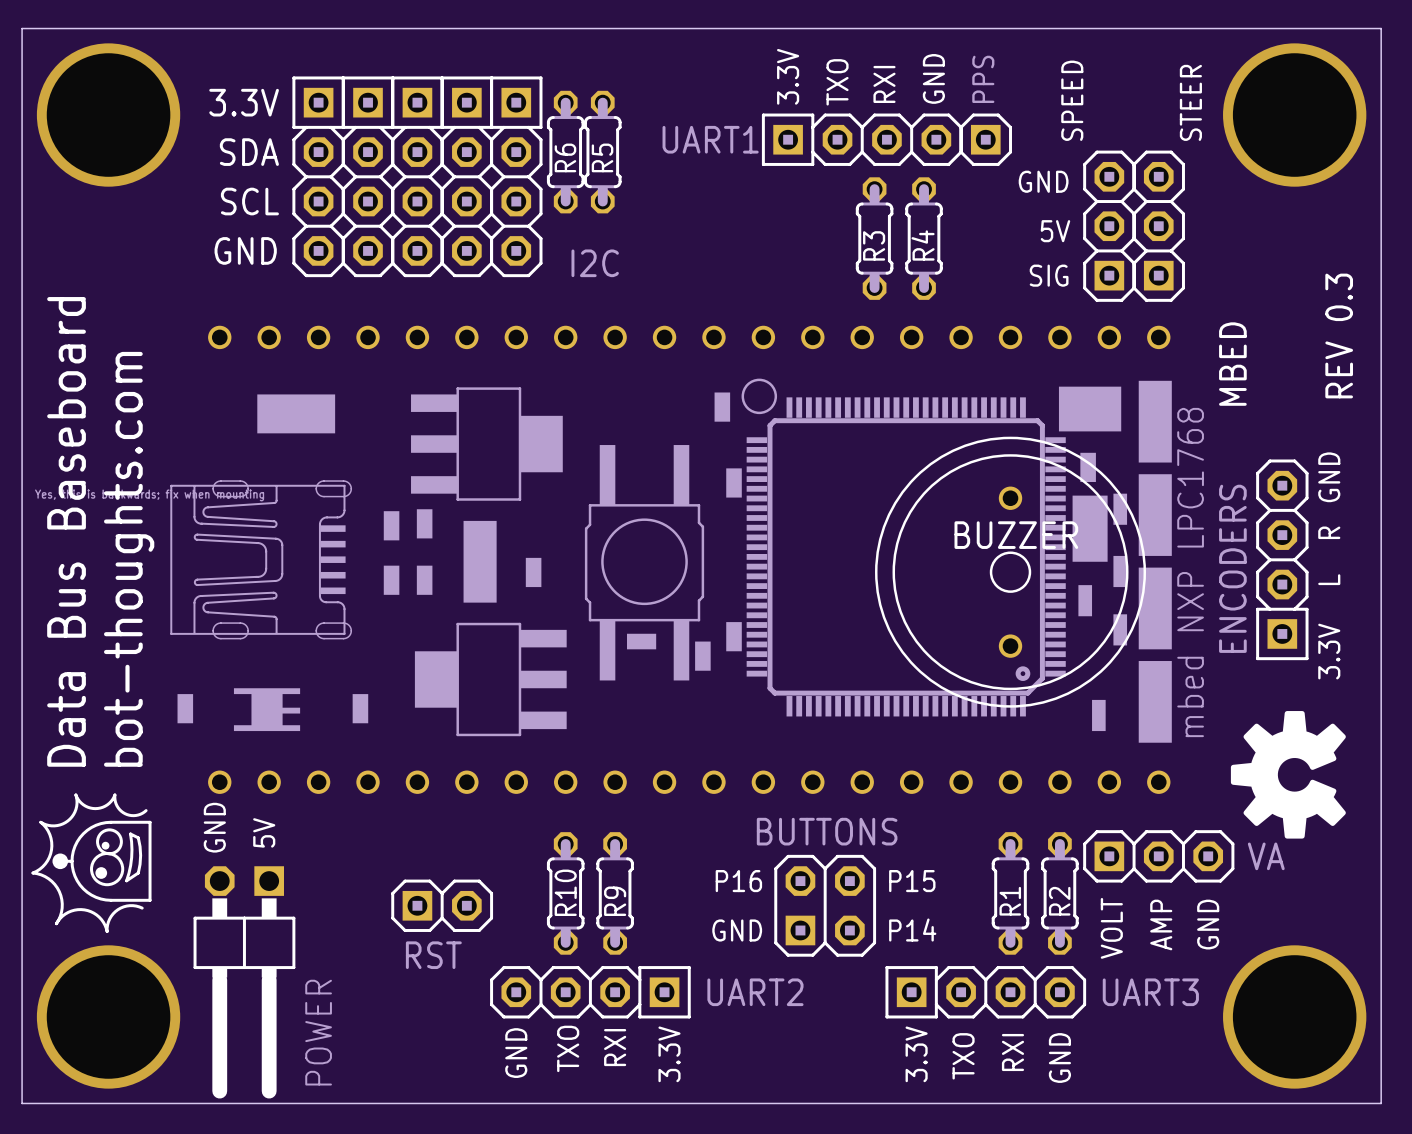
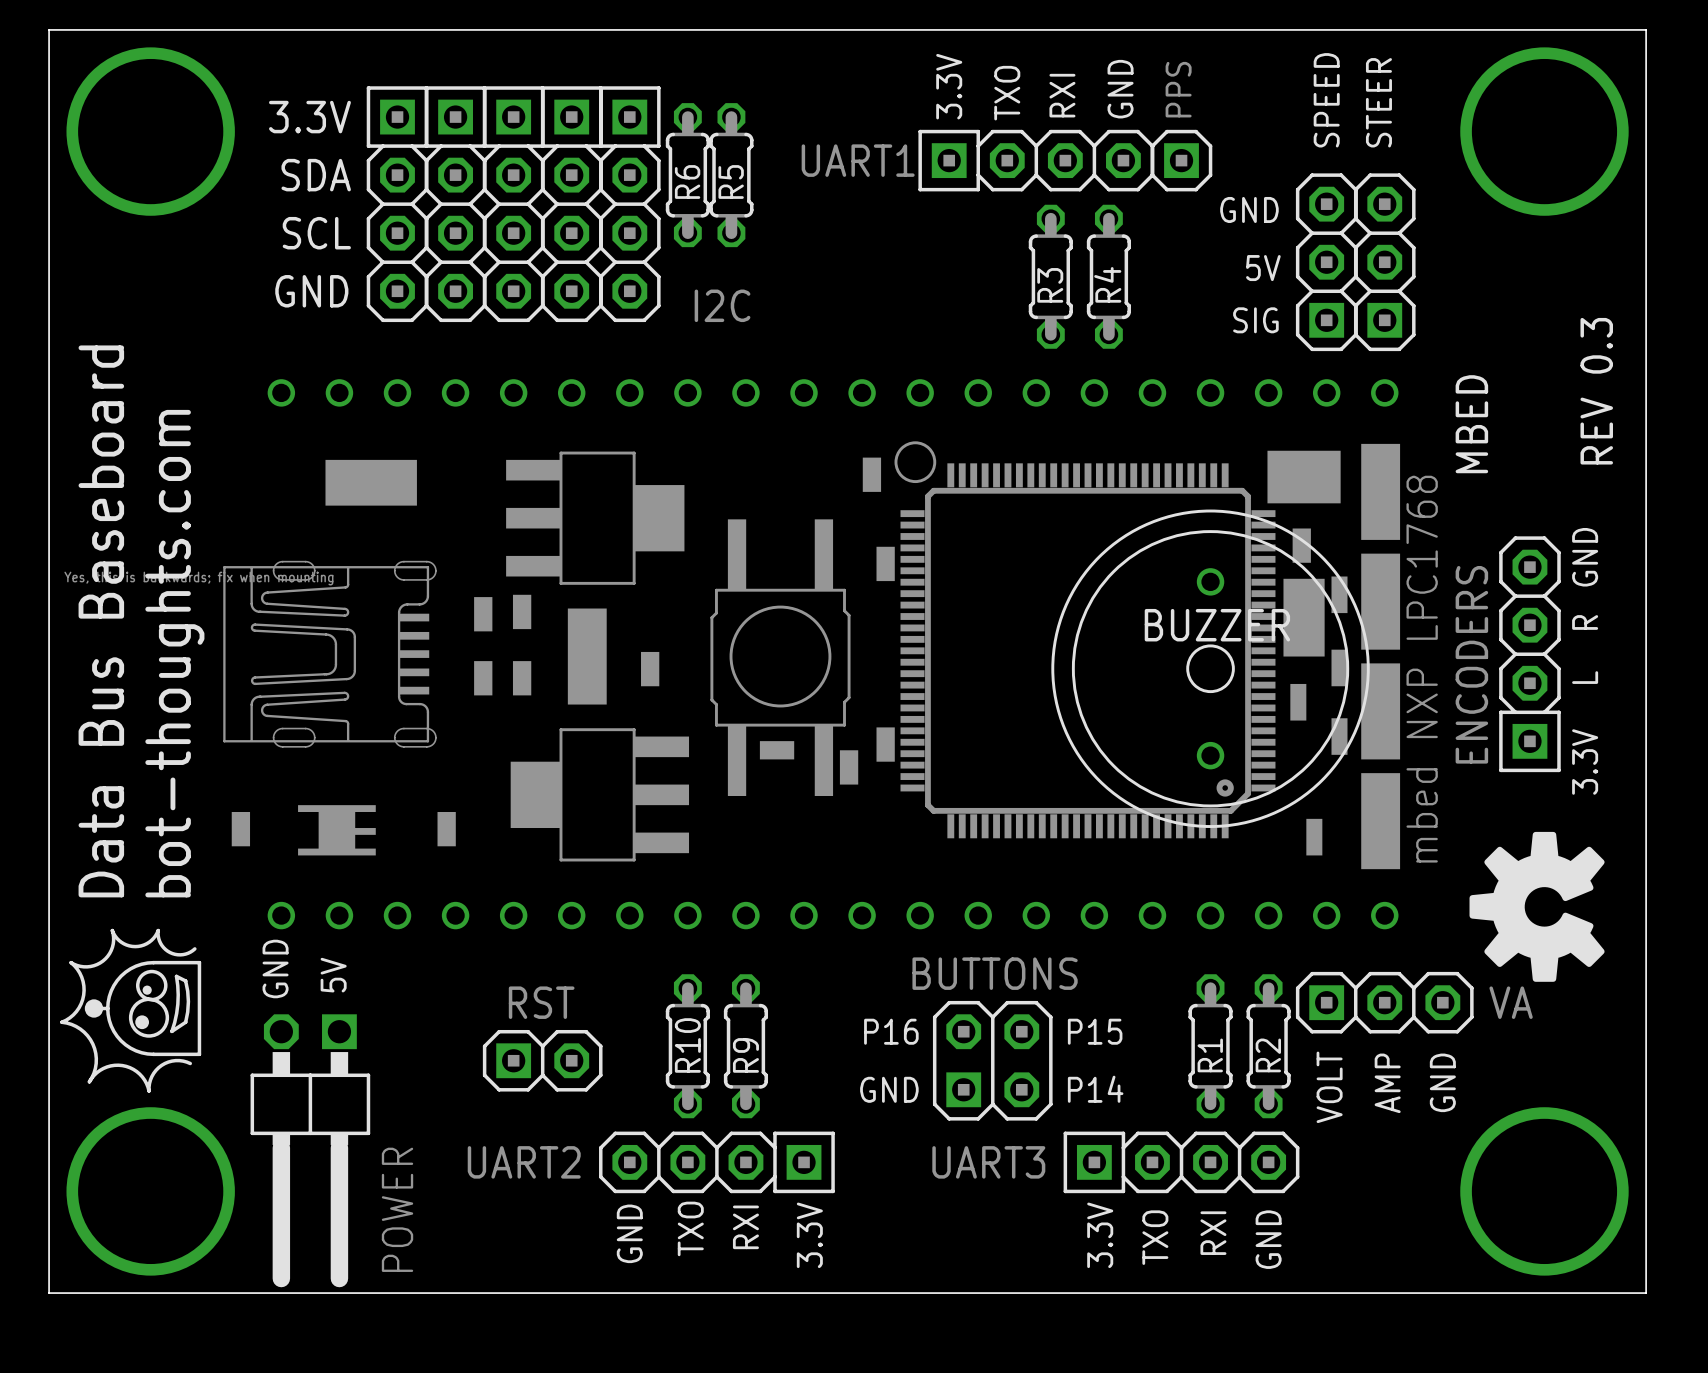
text position: SPEED (1072, 100) -> SPEED (1326, 100)
text position: STEER (1190, 102) -> STEER (1378, 102)
part value position: RST (433, 955) -> RST (541, 1002)
part value position: UART2 (755, 992) -> UART2 (524, 1162)
part value position: UART3 (1150, 992) -> UART3 (988, 1162)

